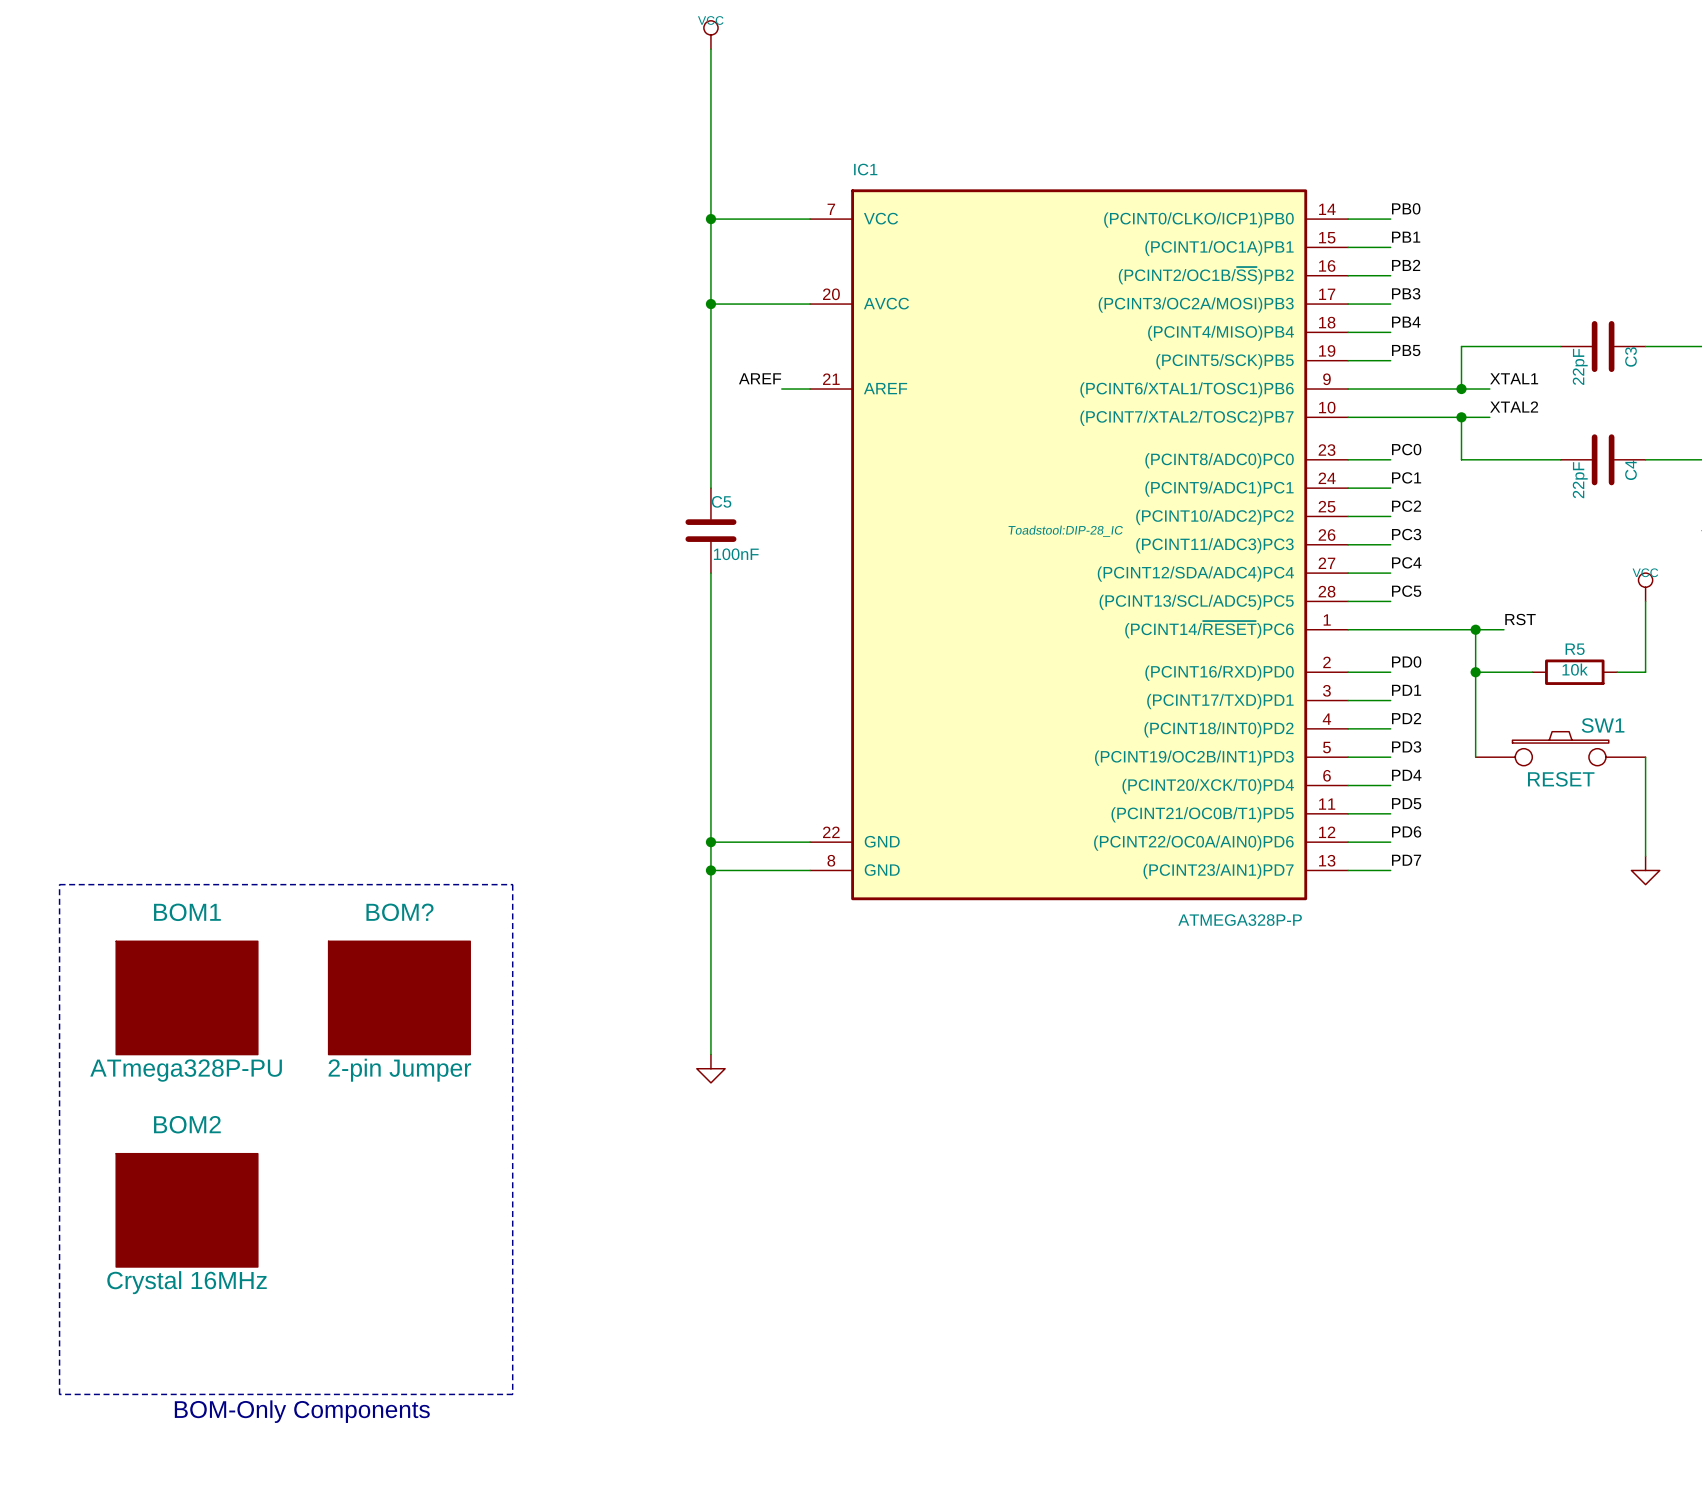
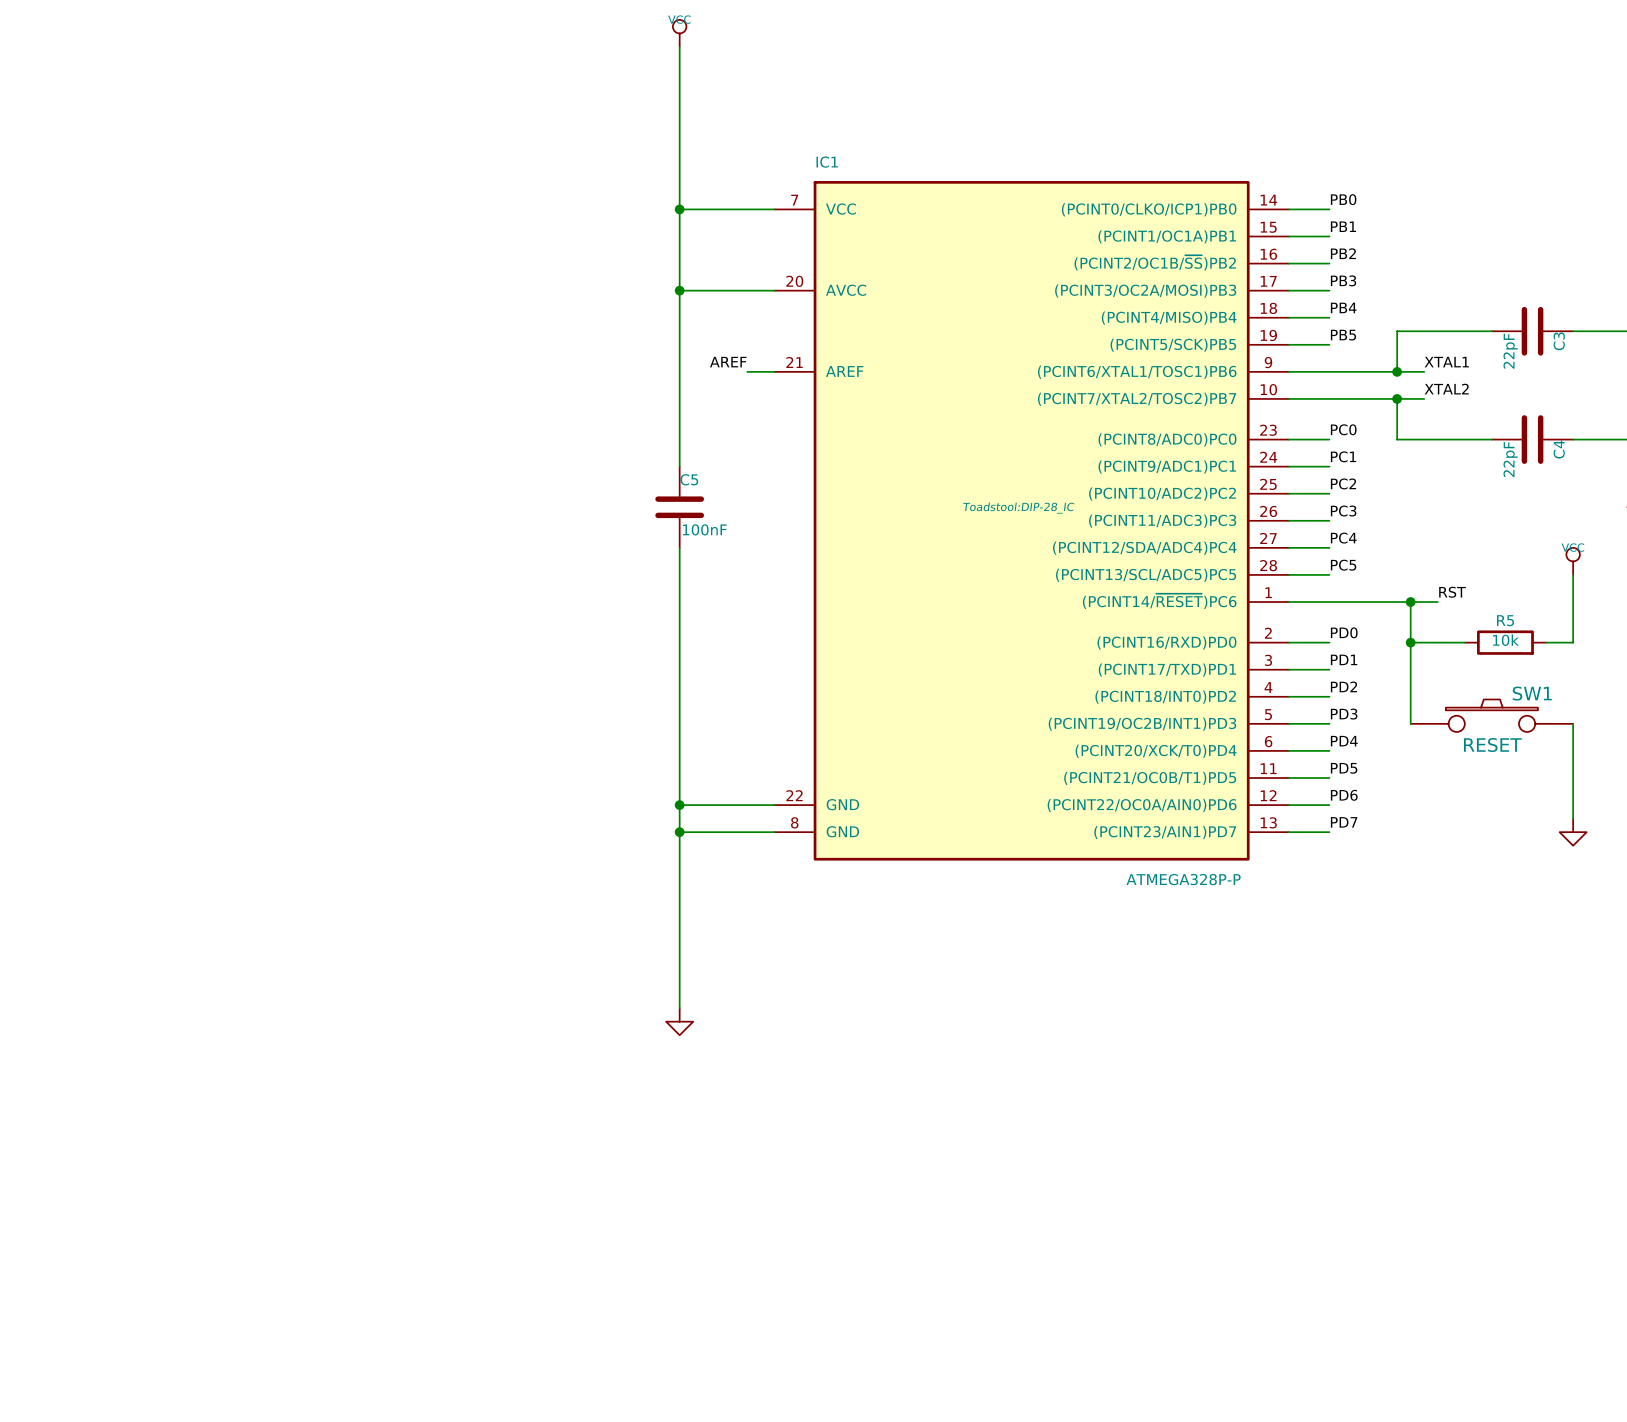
line: (59, 884) (512, 884) (512, 1394) (59, 1394) (59, 884) -> none
BOM1: ATmega328P-PU (187, 997) -> none
BOM?: 2-pin Jumper (399, 997) -> none
BOM2: Crystal 16MHz (187, 1210) -> none
text: BOM-Only Components (302, 1411) -> none

